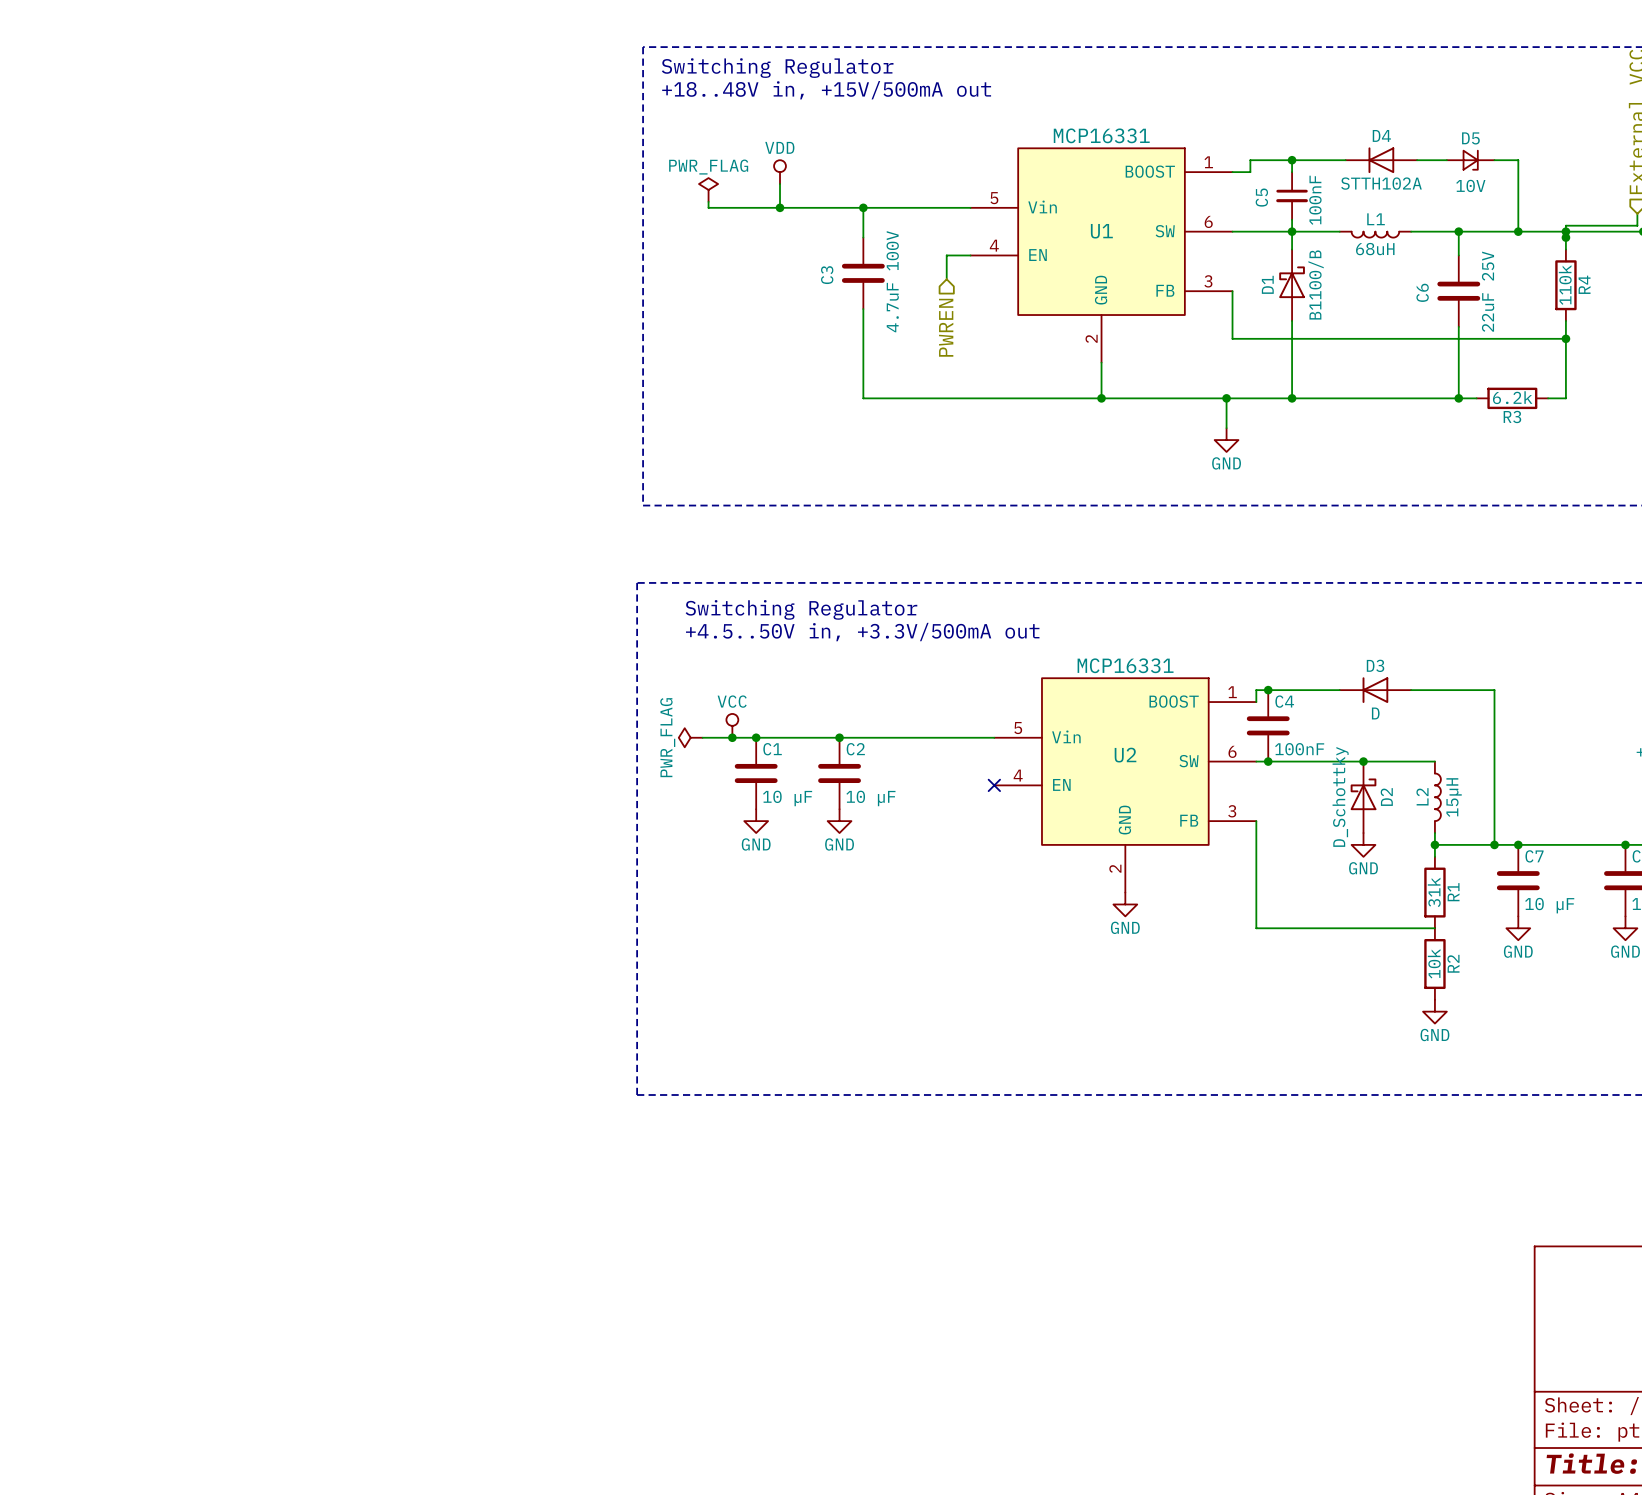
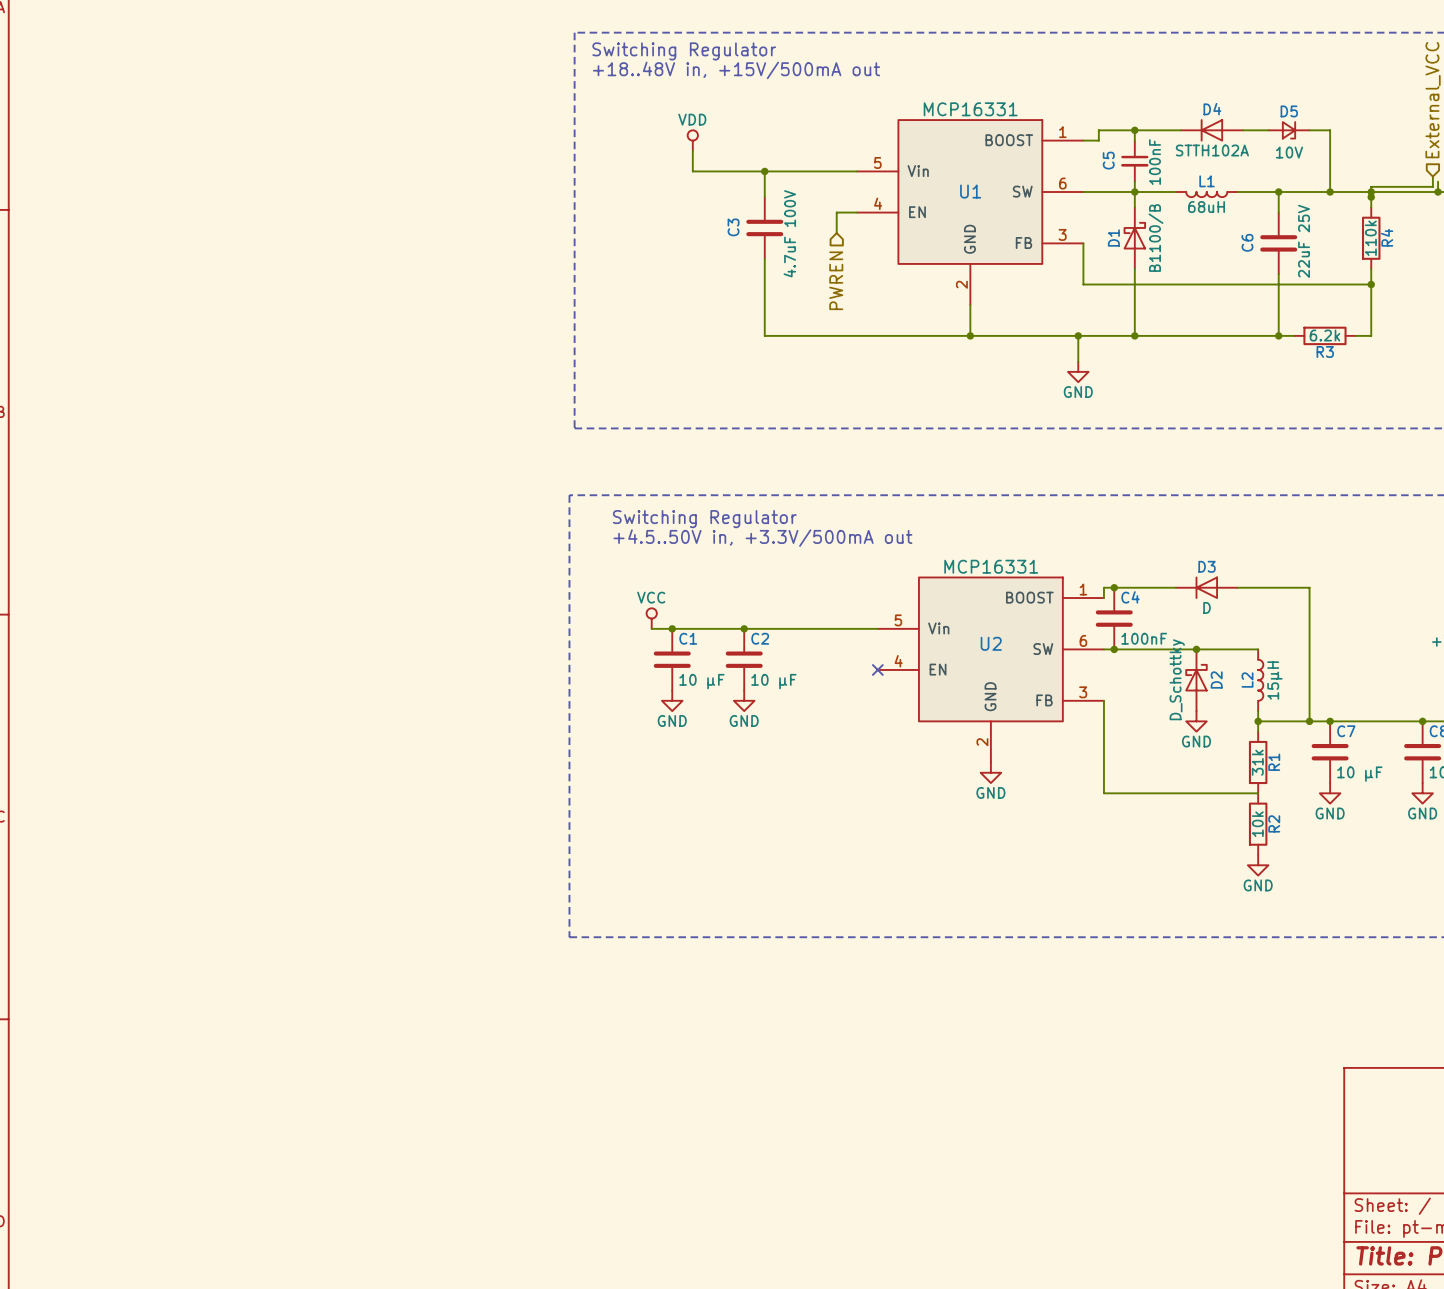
power symbol: PWR_FLAG (708, 189) -> none
wire: (708, 201) (708, 207) (780, 207) -> none
junction: (780, 207) -> none
power symbol: PWR_FLAG (690, 737) -> none
wire: (702, 737) (732, 737) -> none
junction: (732, 737) -> none

